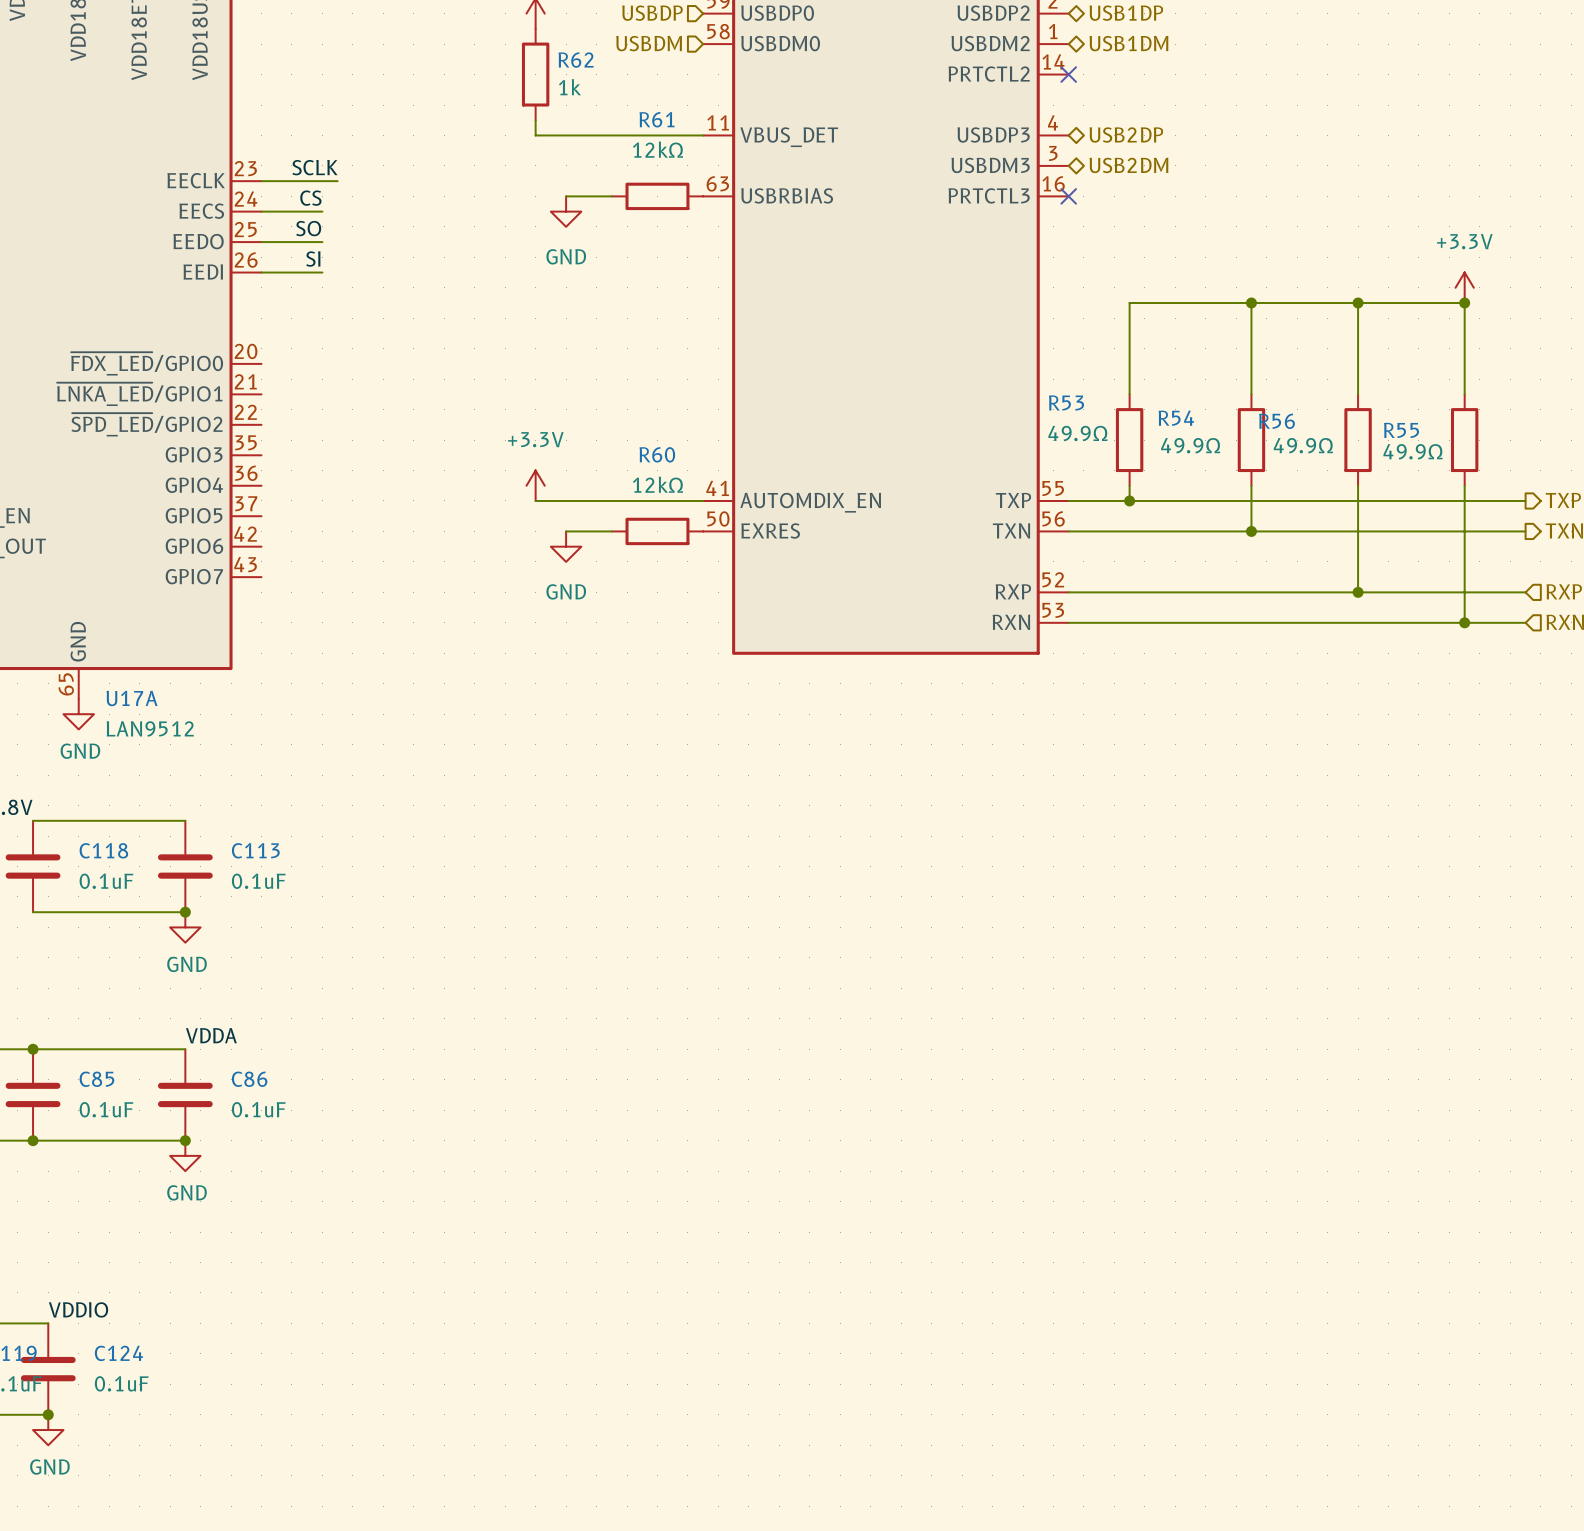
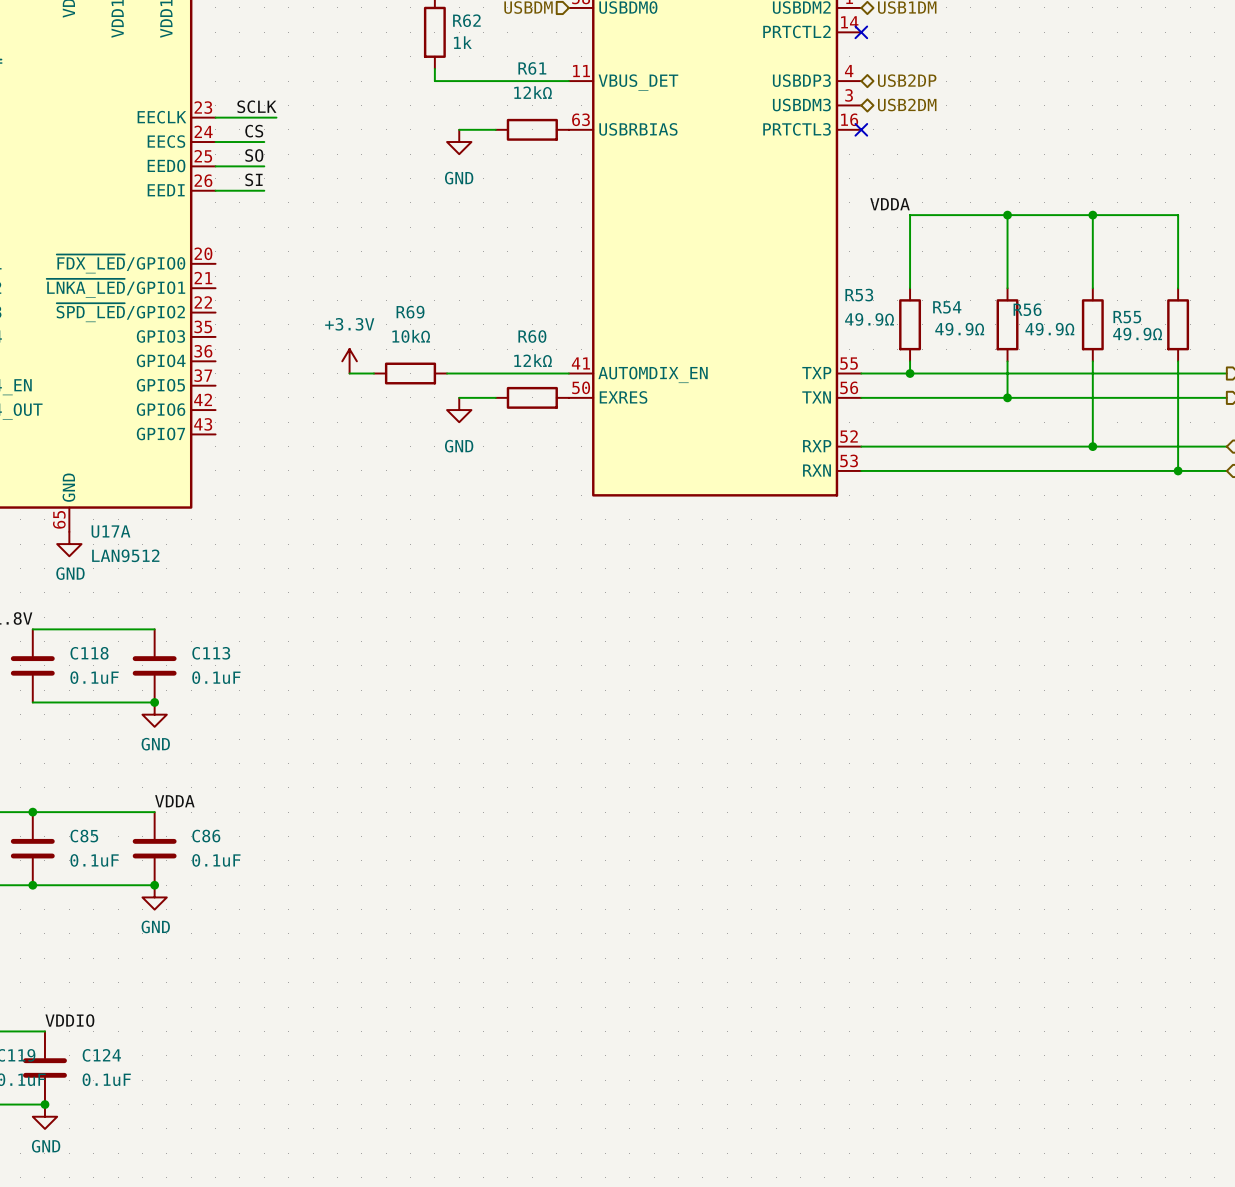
power symbol: +3.3V (1464, 287) -> none
label: none -> VDDA (890, 204)
junction: (1464, 302) -> none
power symbol position: +3.3V (535, 485) -> +3.3V (349, 361)
wire: none -> (349, 373) (373, 373)
R69: none -> 10kΩ (410, 373)

